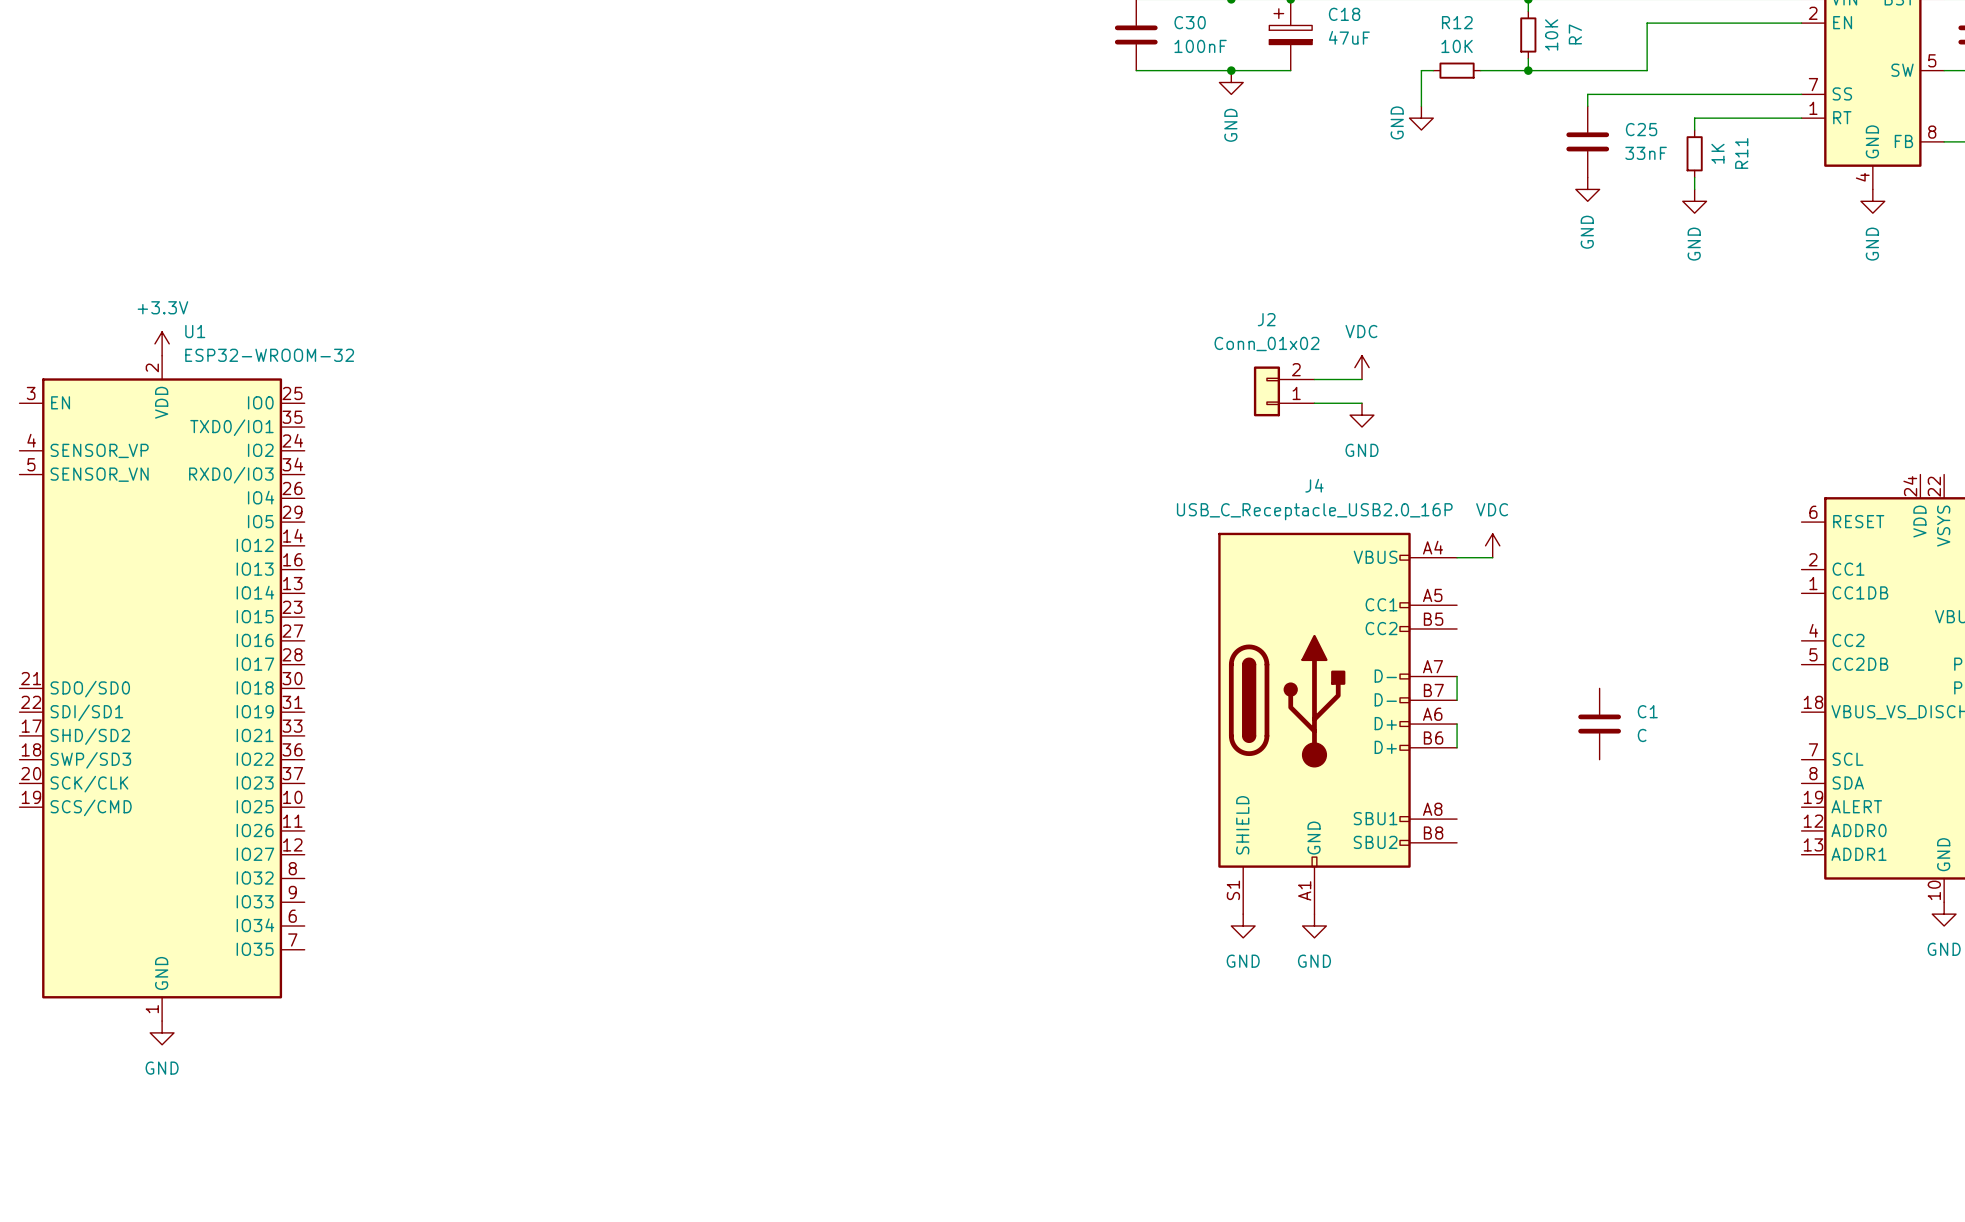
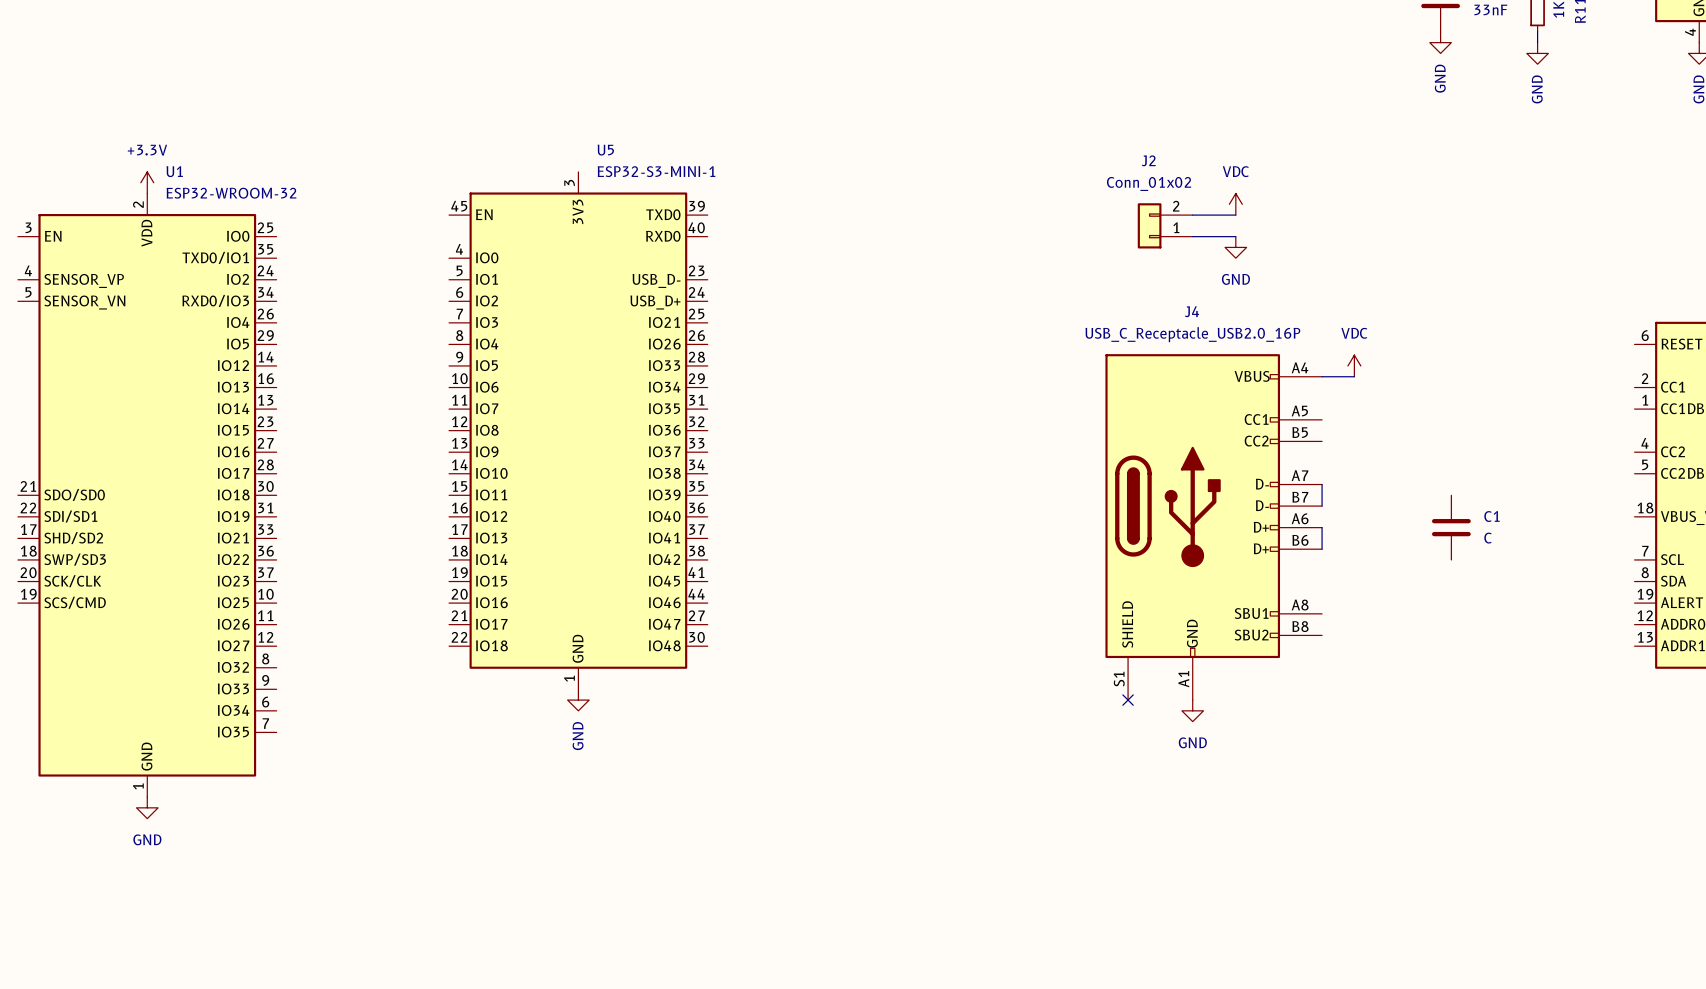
U5: none -> ESP32-S3-MINI-1 (578, 430)
power symbol: none -> GND (578, 700)
no-connect mark: none -> (1128, 700)
power symbol: GND (1243, 926) -> none

